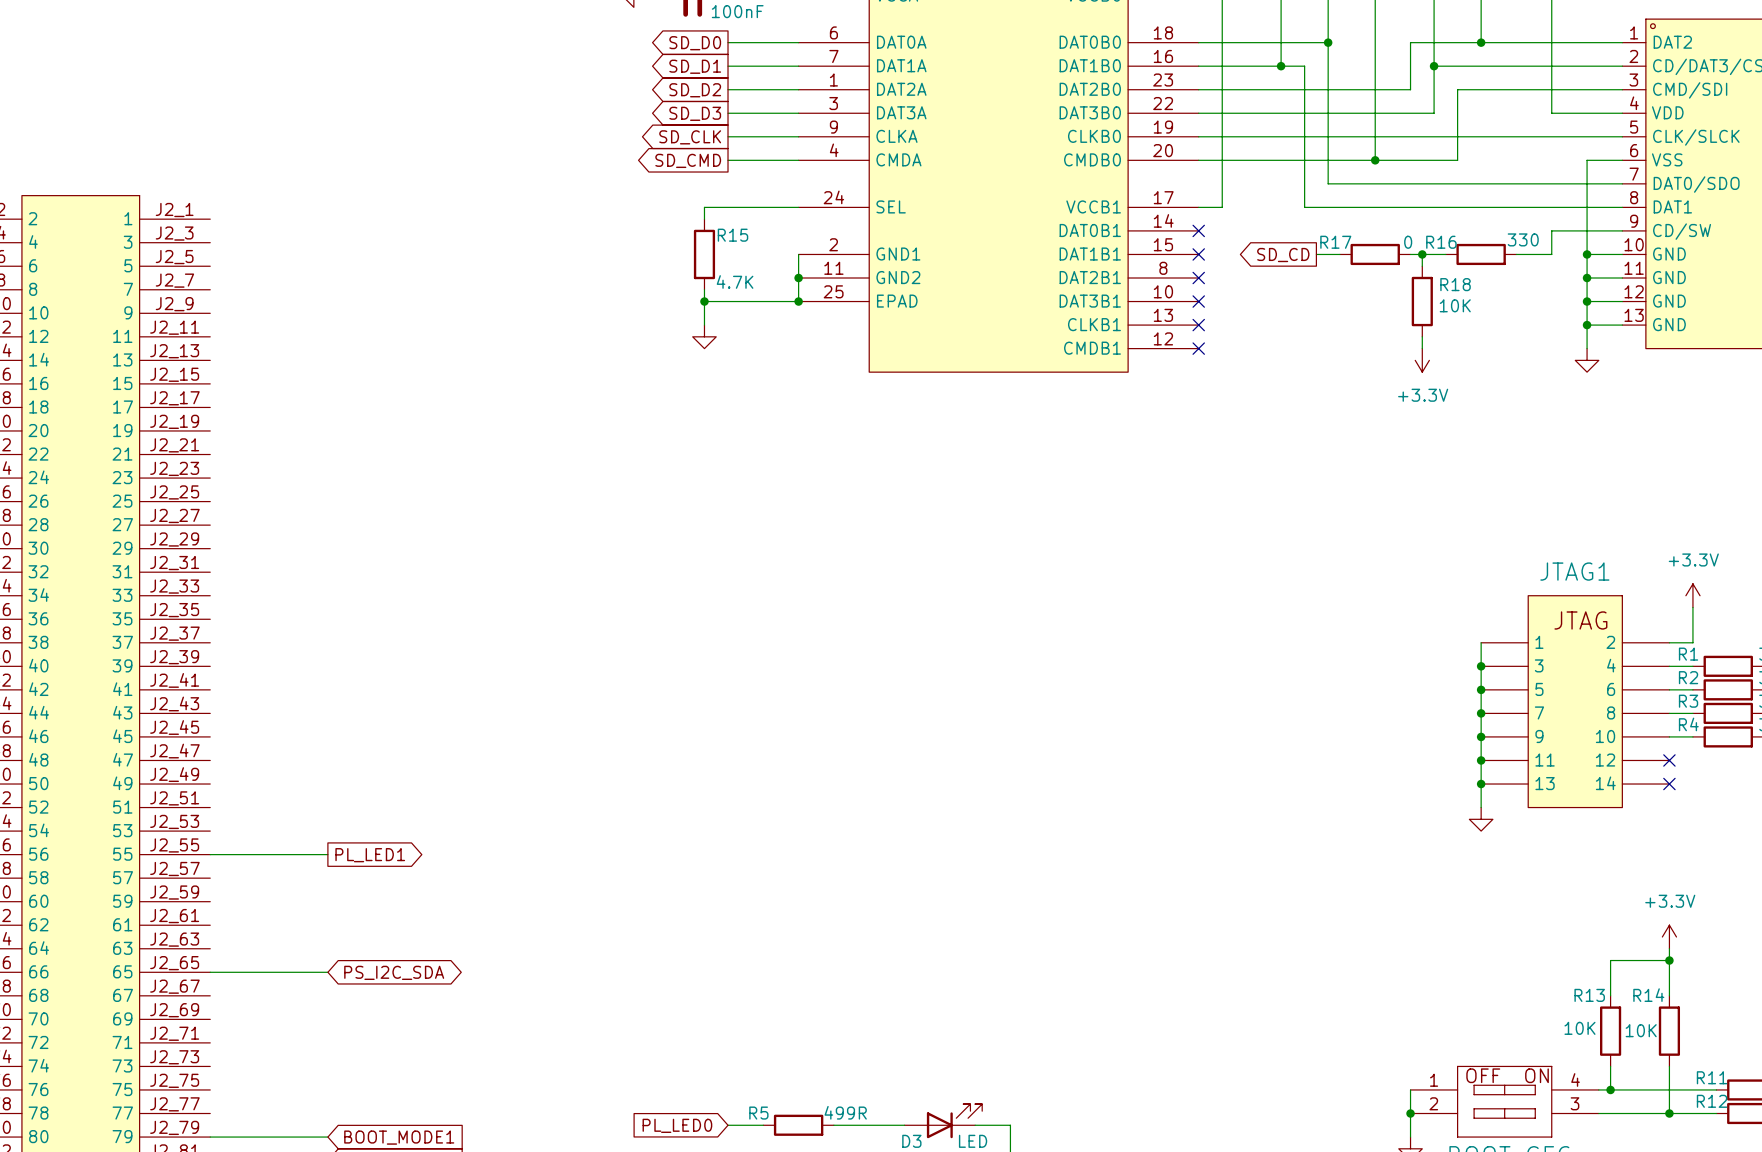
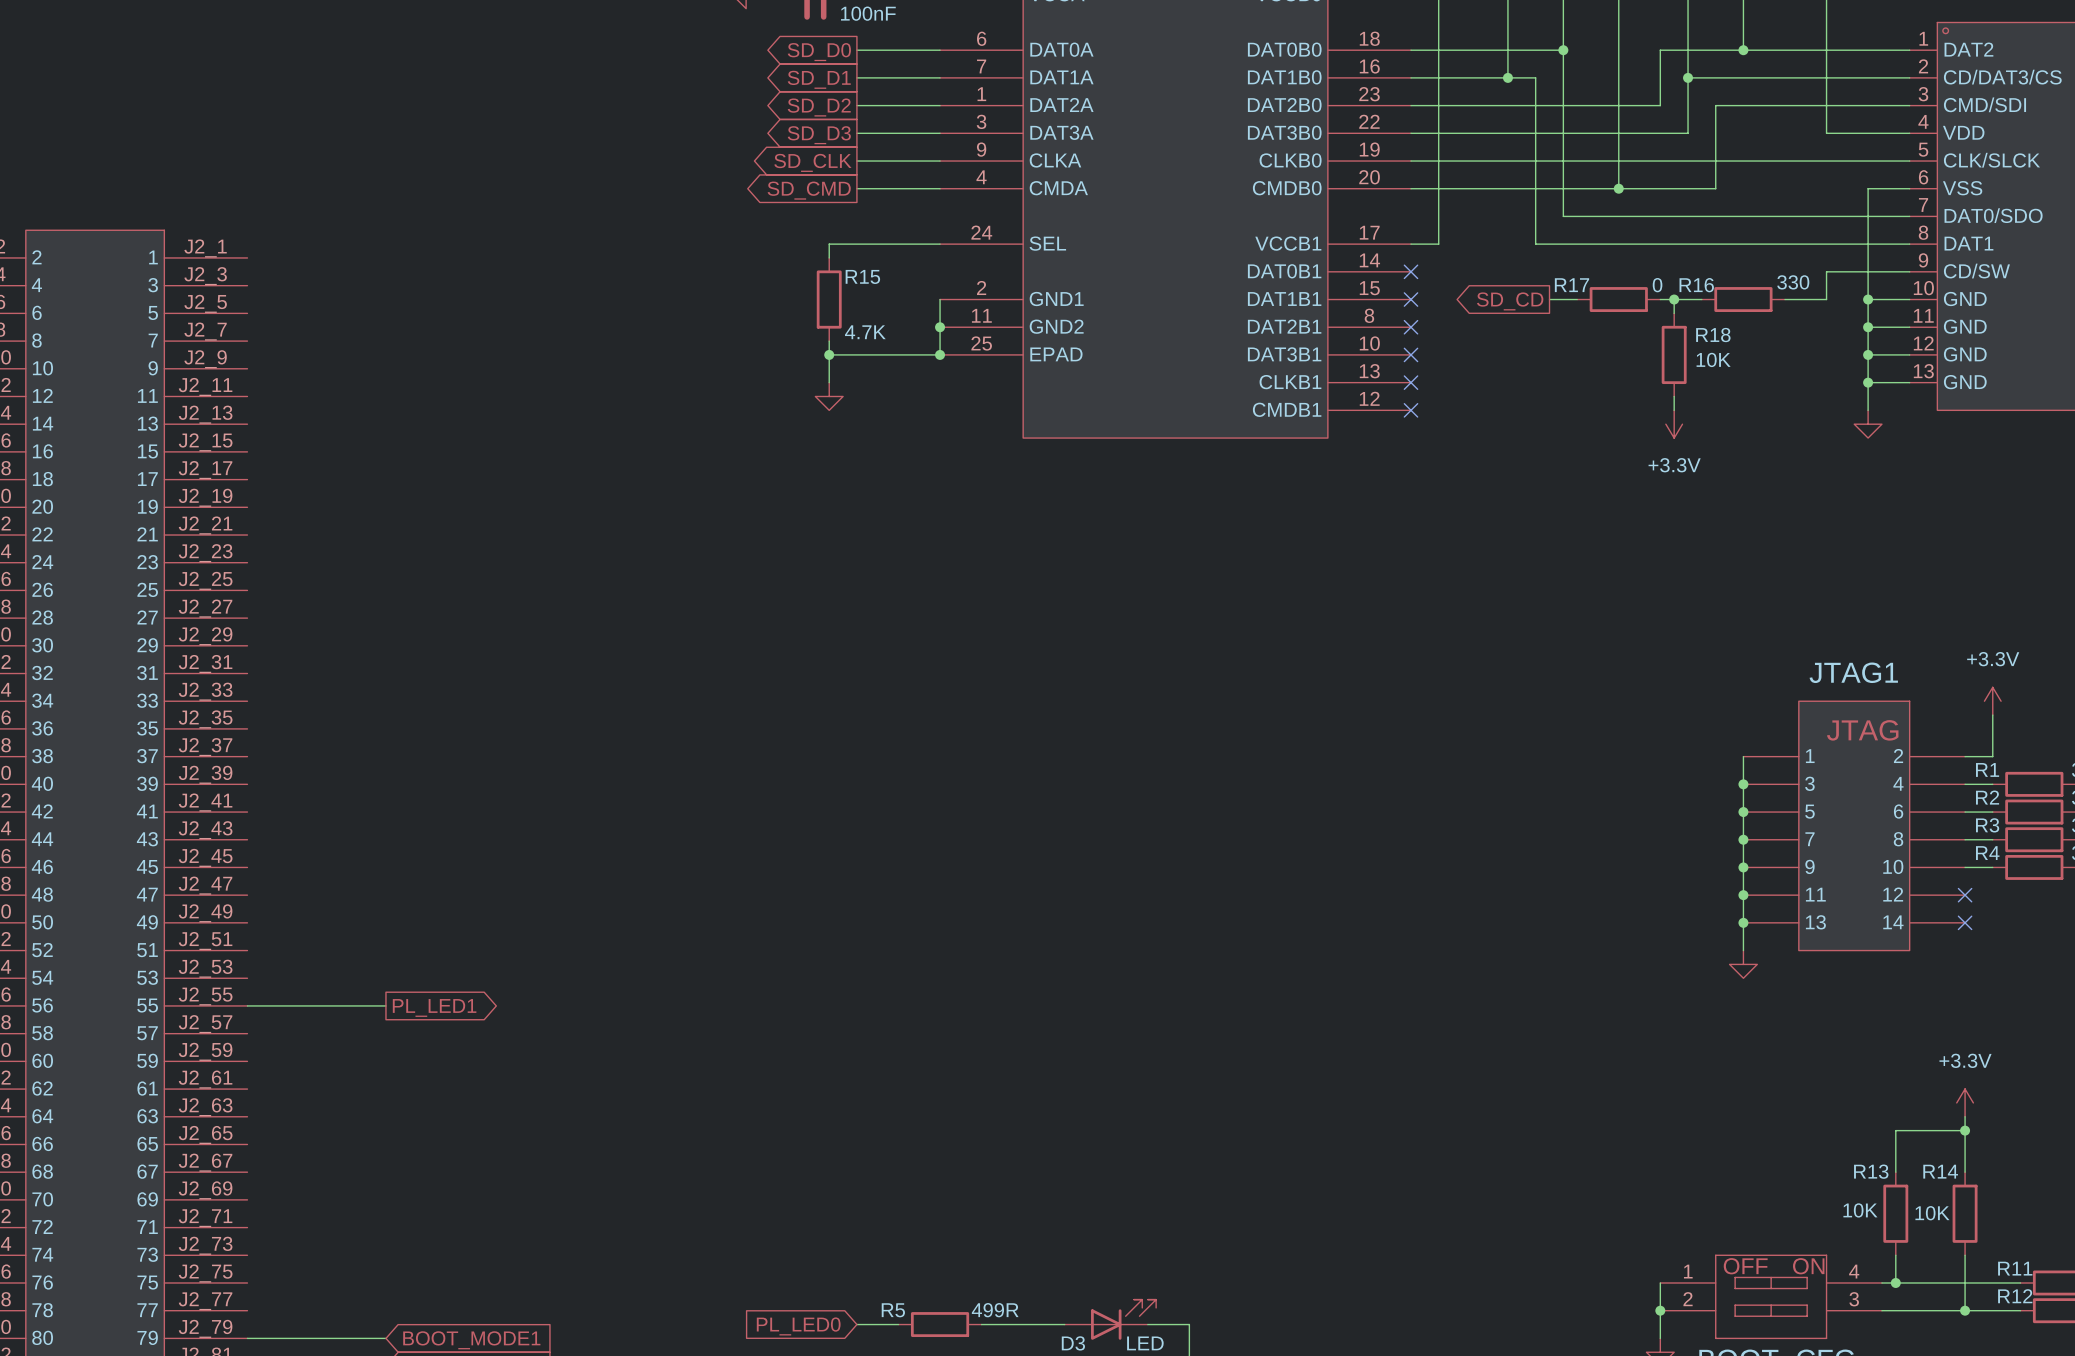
wire: (210, 972) (327, 972) -> none
global label: PS_I2C_SDA (394, 972) -> none

